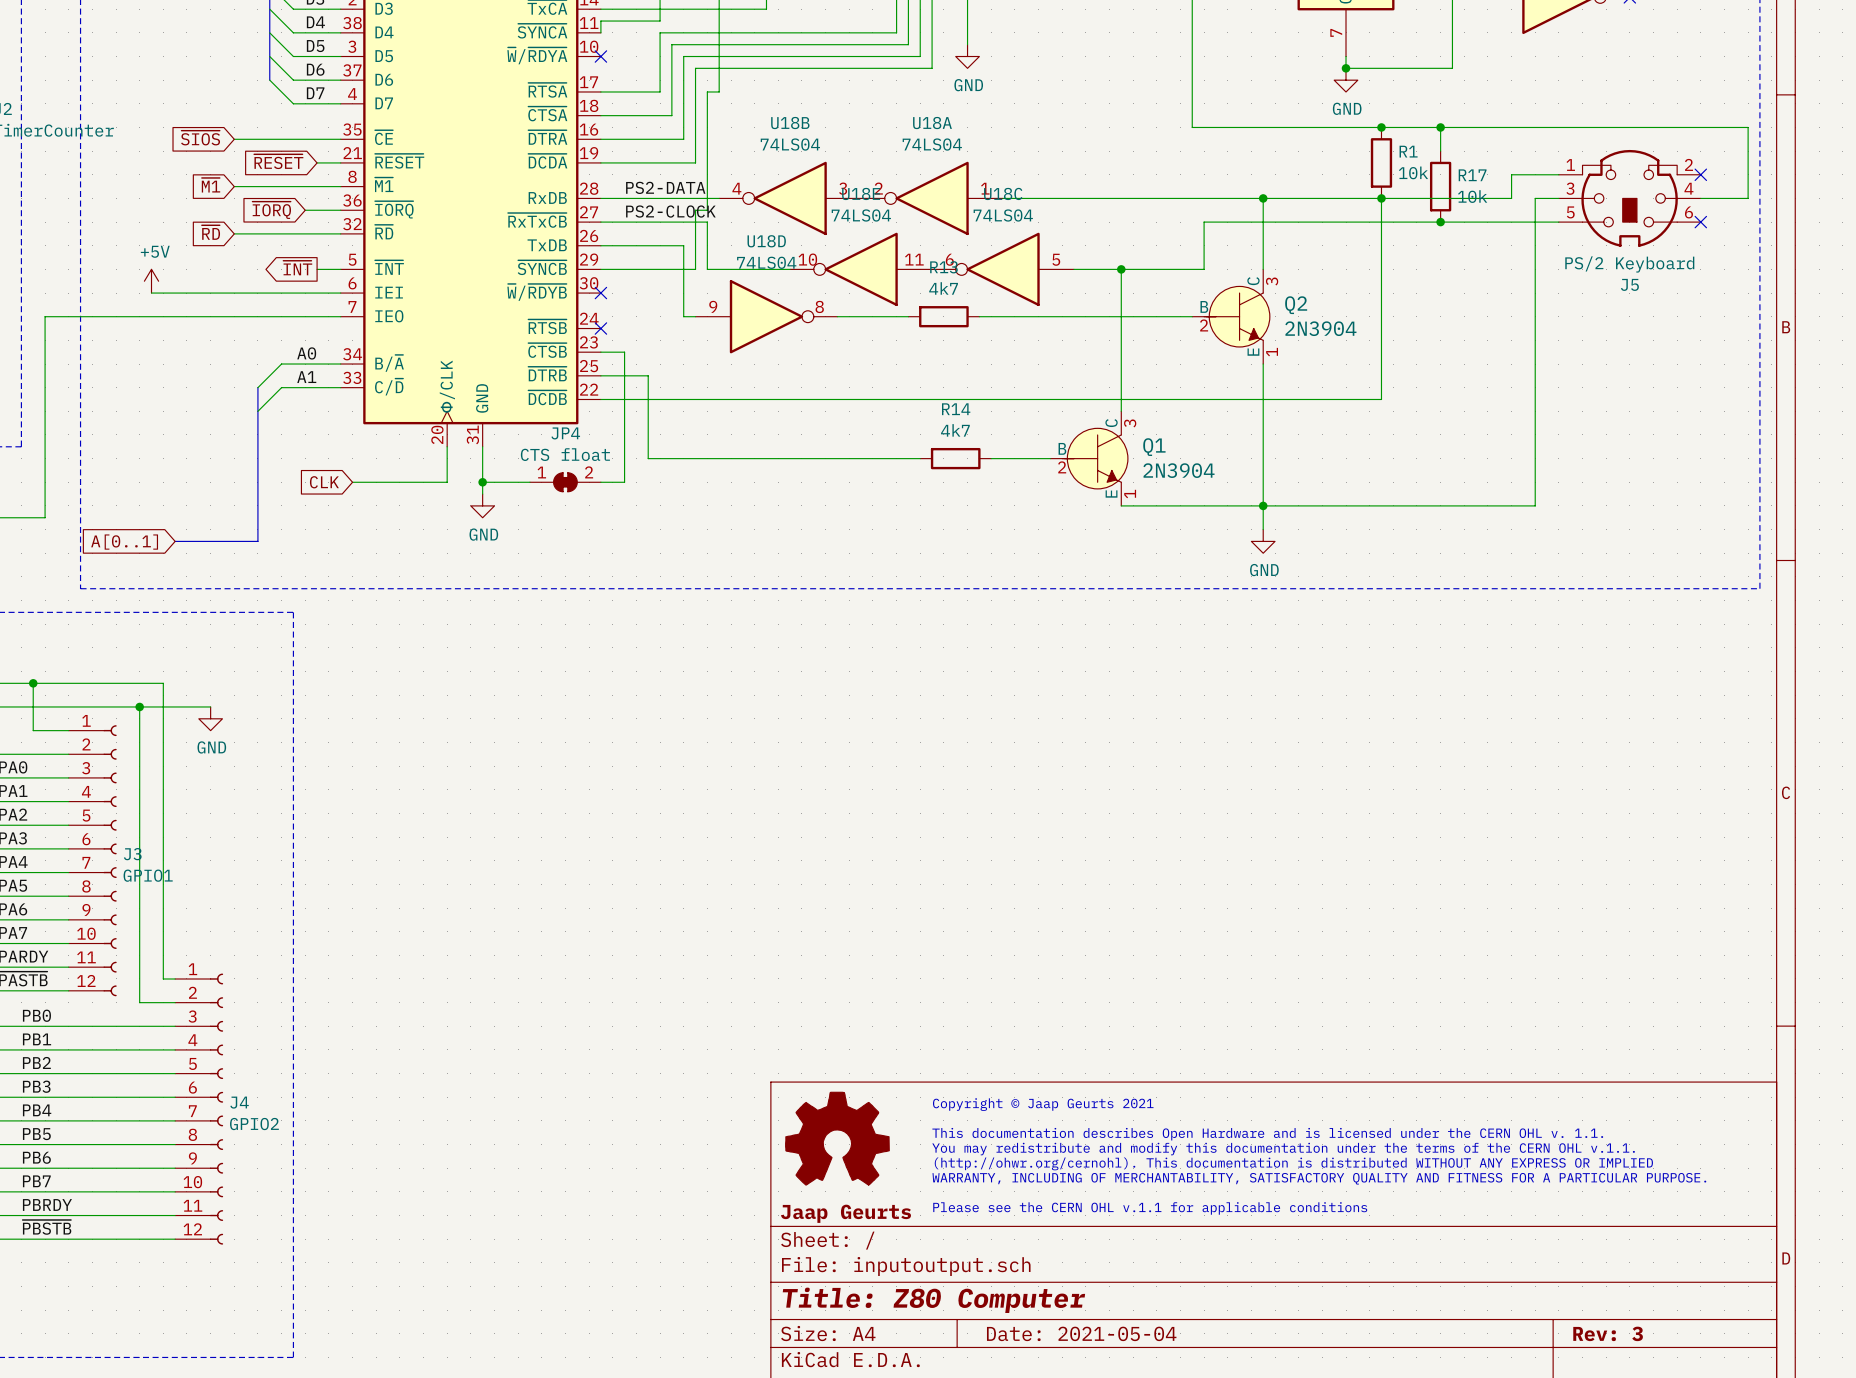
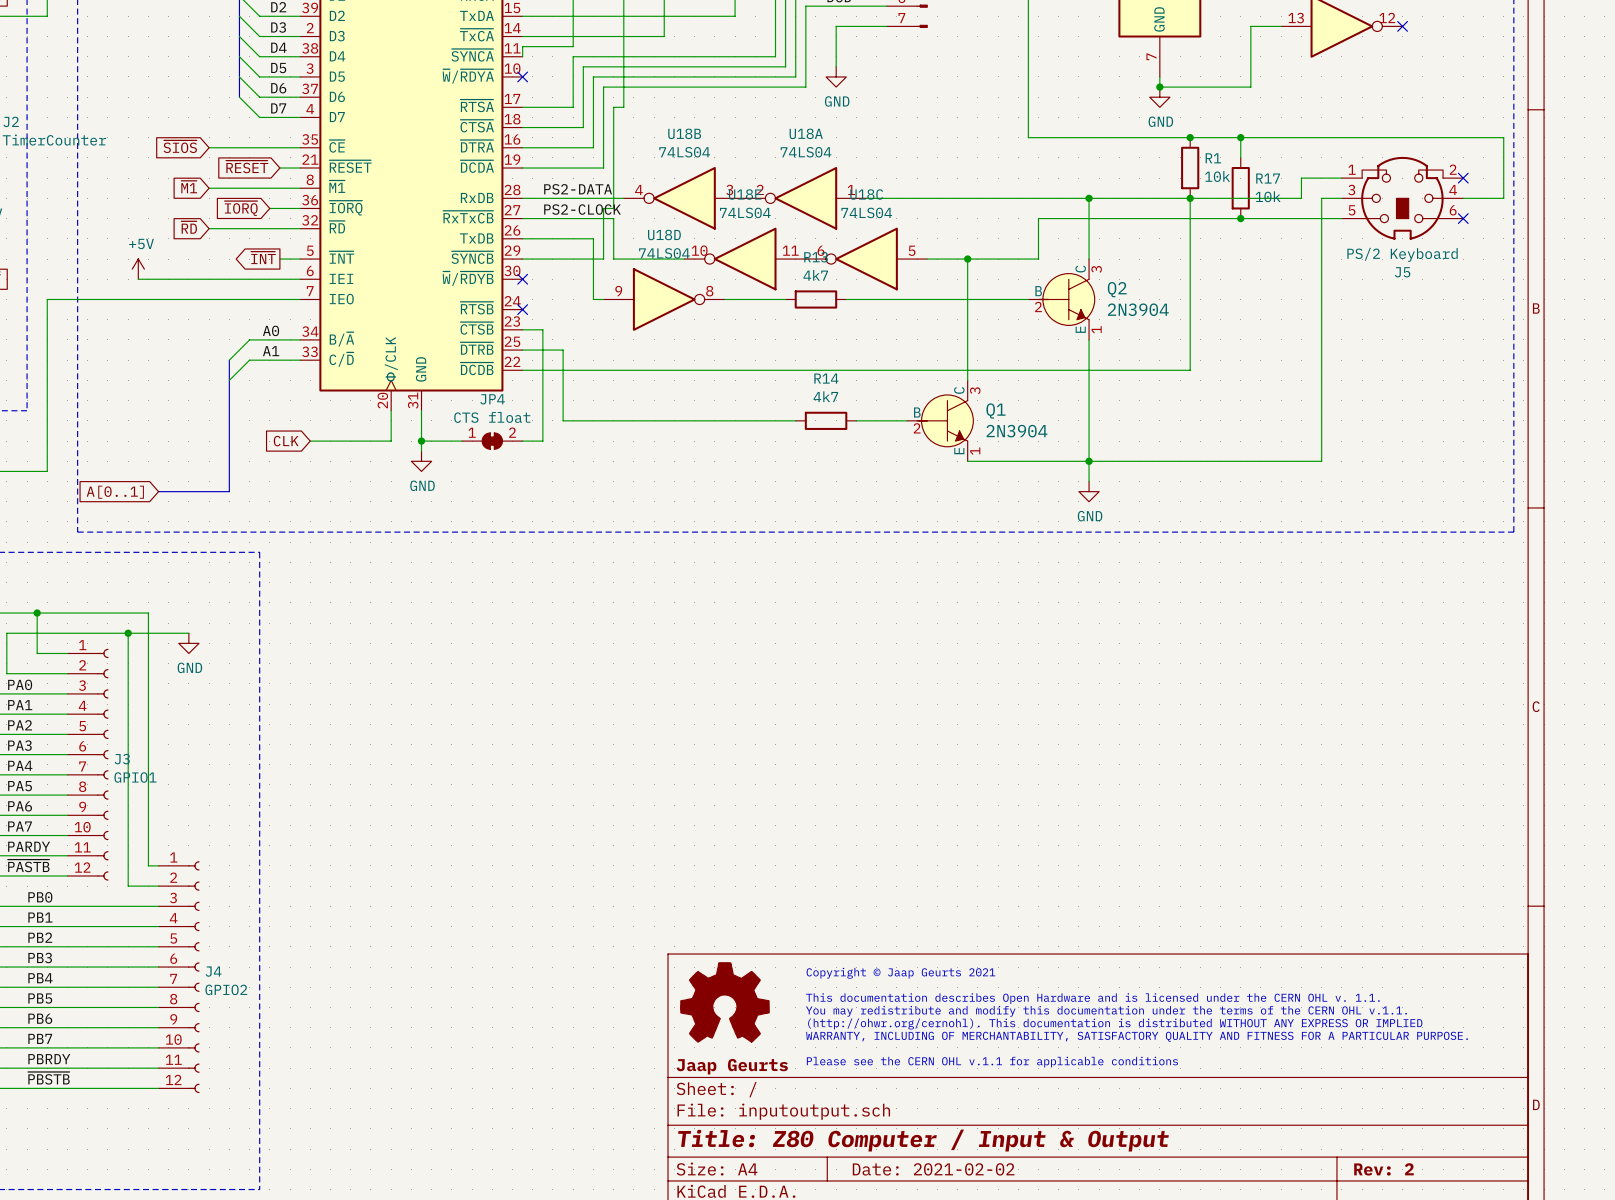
title block: Title: Z80 Computer (933, 1300) -> Title: Z80 Computer / Input & Output (923, 1140)
title block: Date: 2021-05-04 (1081, 1333) -> Date: 2021-02-02 (933, 1169)
title block: Rev: 3 (1608, 1333) -> Rev: 2 (1383, 1169)

